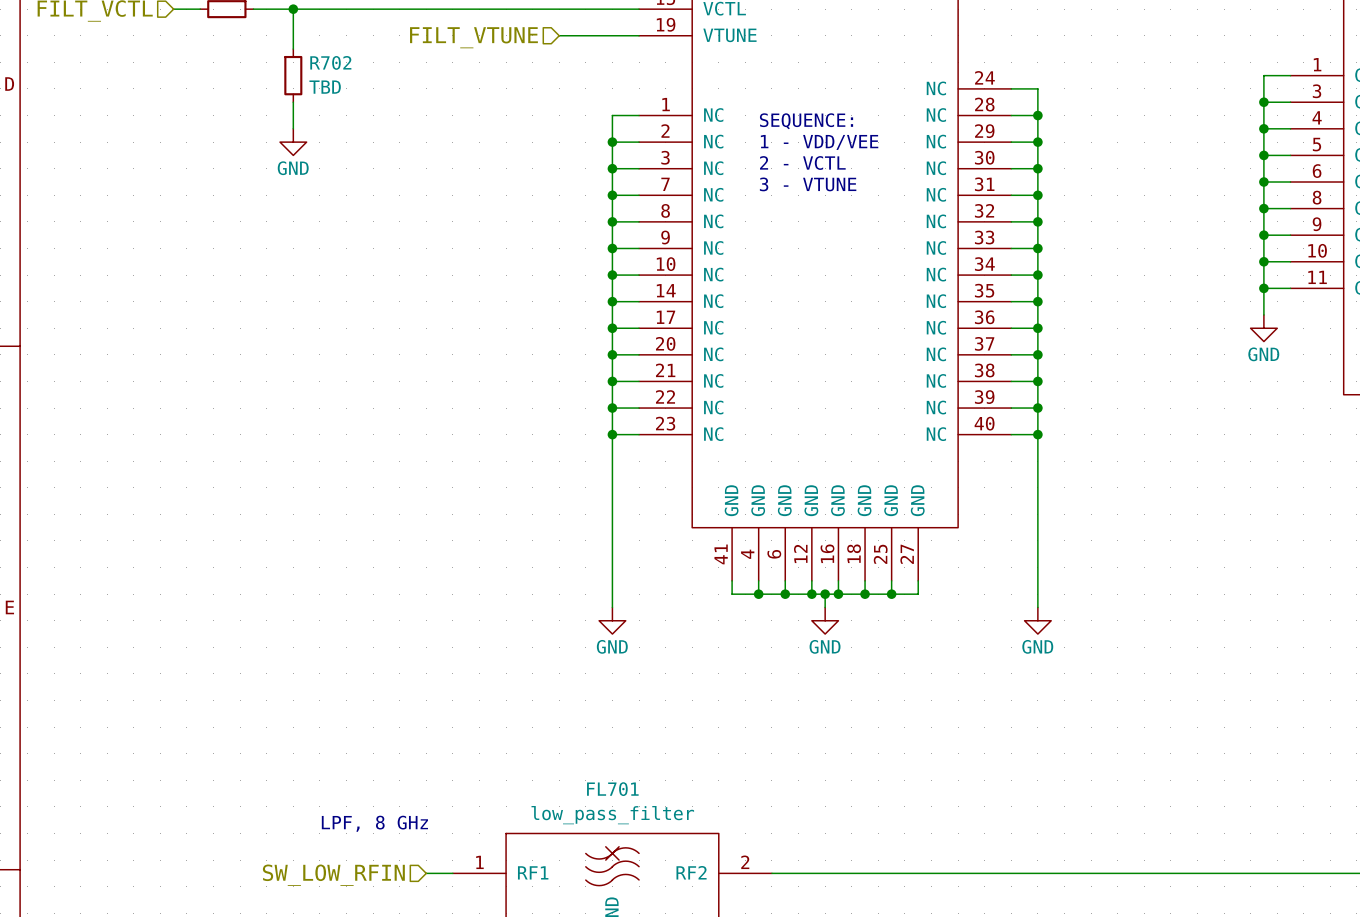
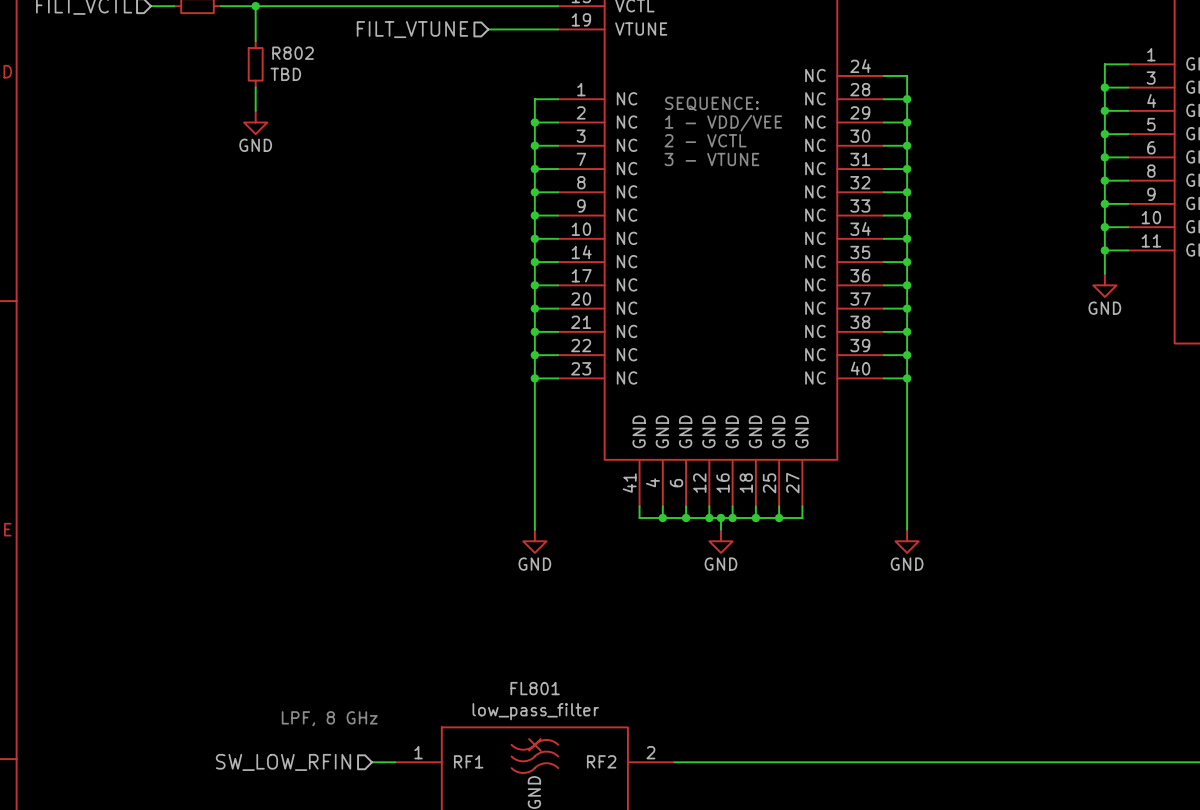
R702 name: R702 (330, 62) -> R802 (293, 53)
FL701 name: FL701 (612, 789) -> FL801 (535, 688)

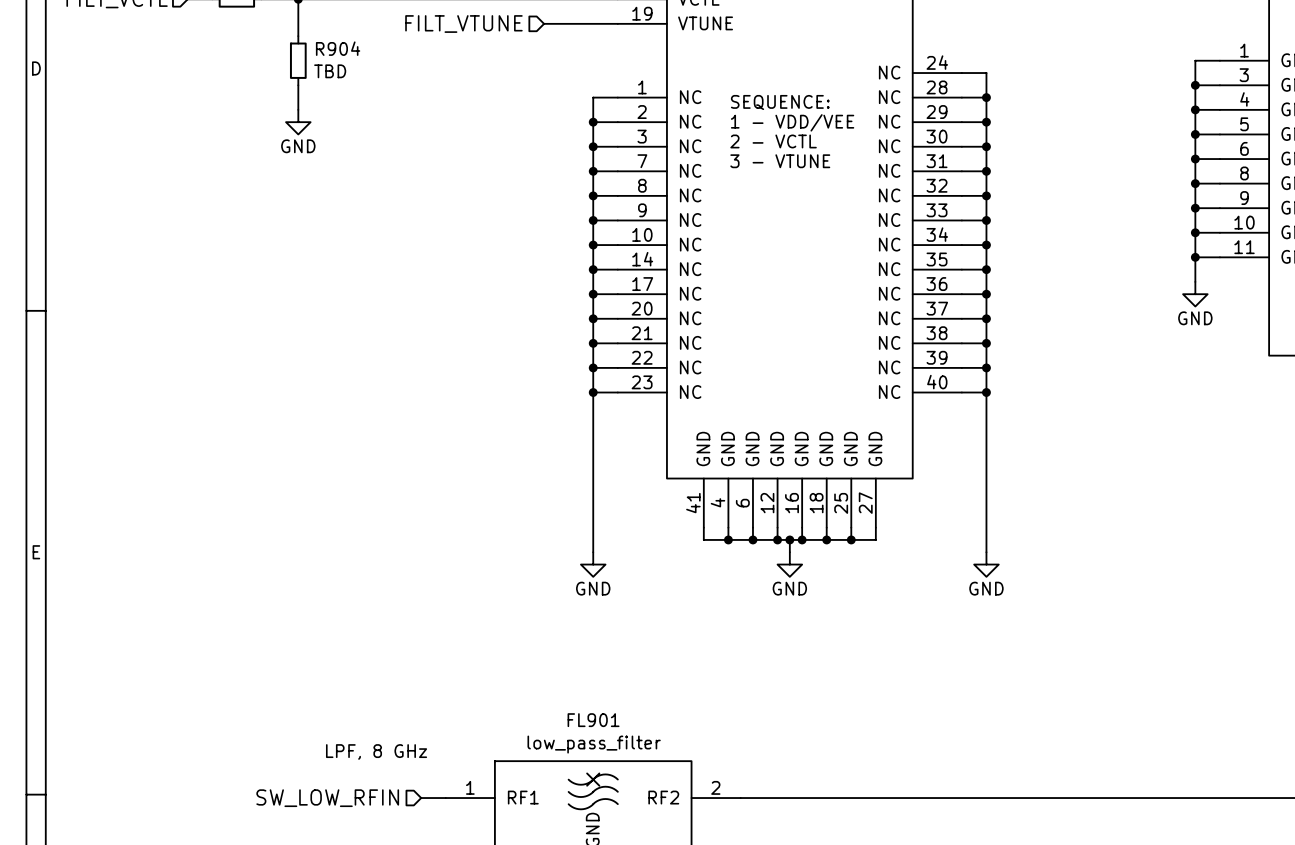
R802 name: R802 (293, 53) -> R904 (338, 48)
FL801 name: FL801 (535, 688) -> FL901 (593, 720)

